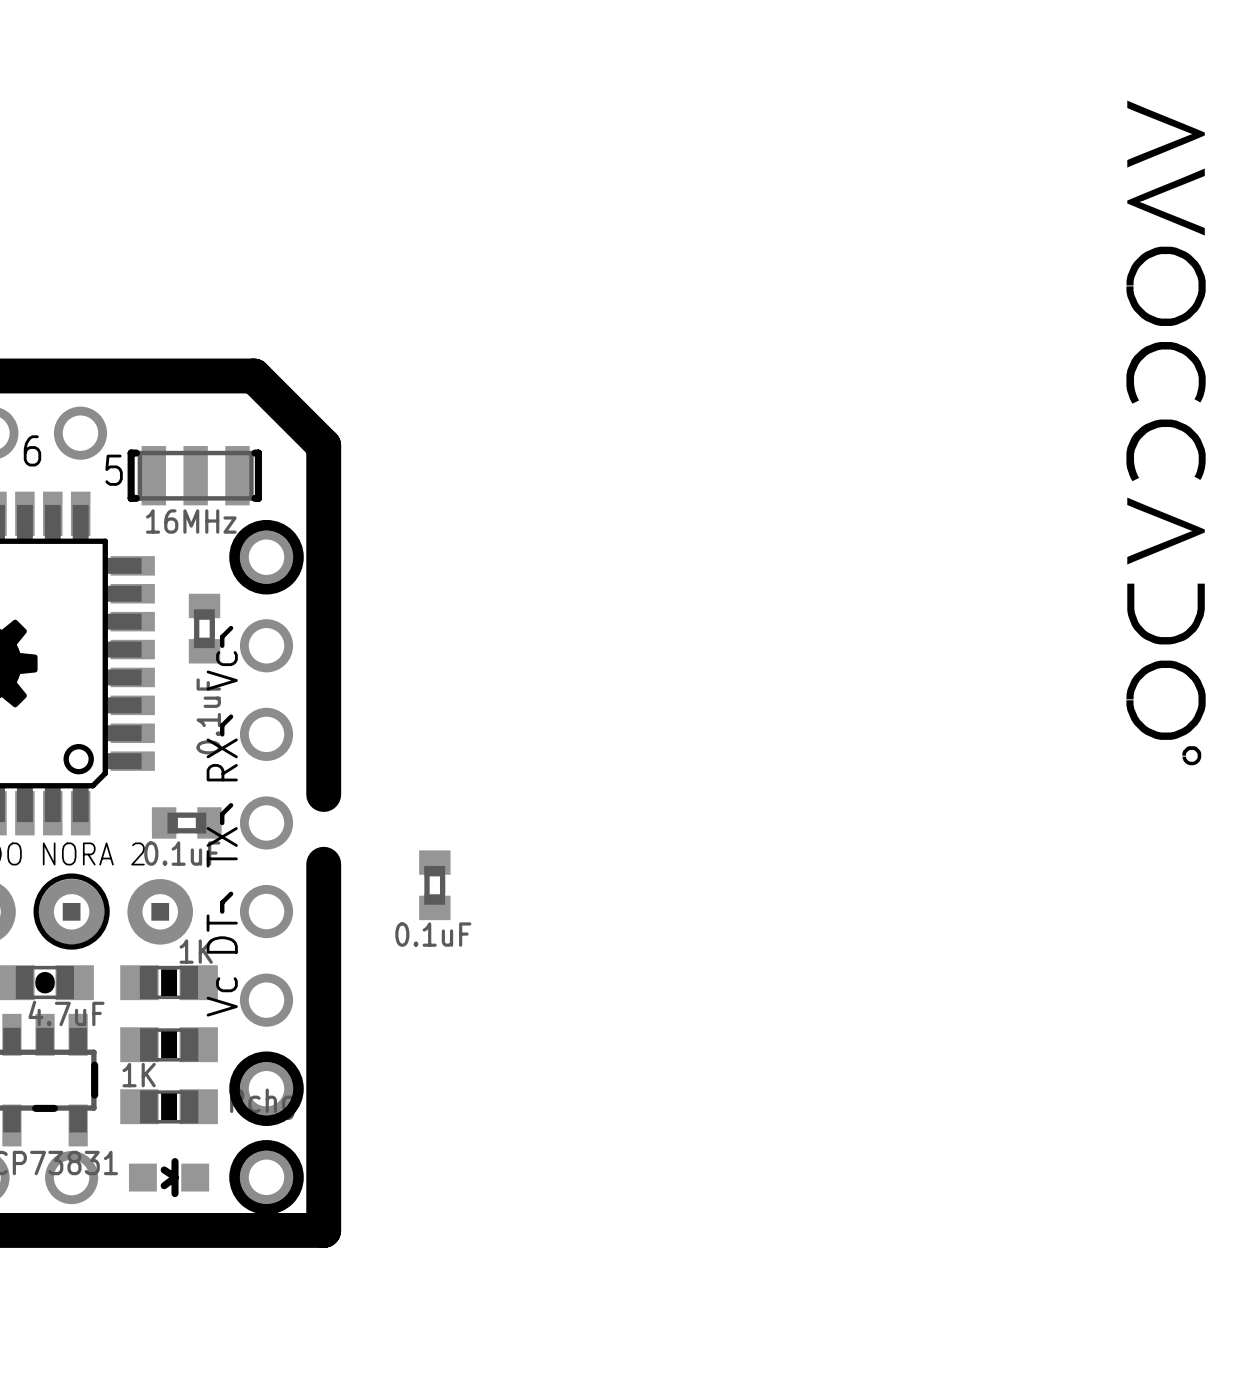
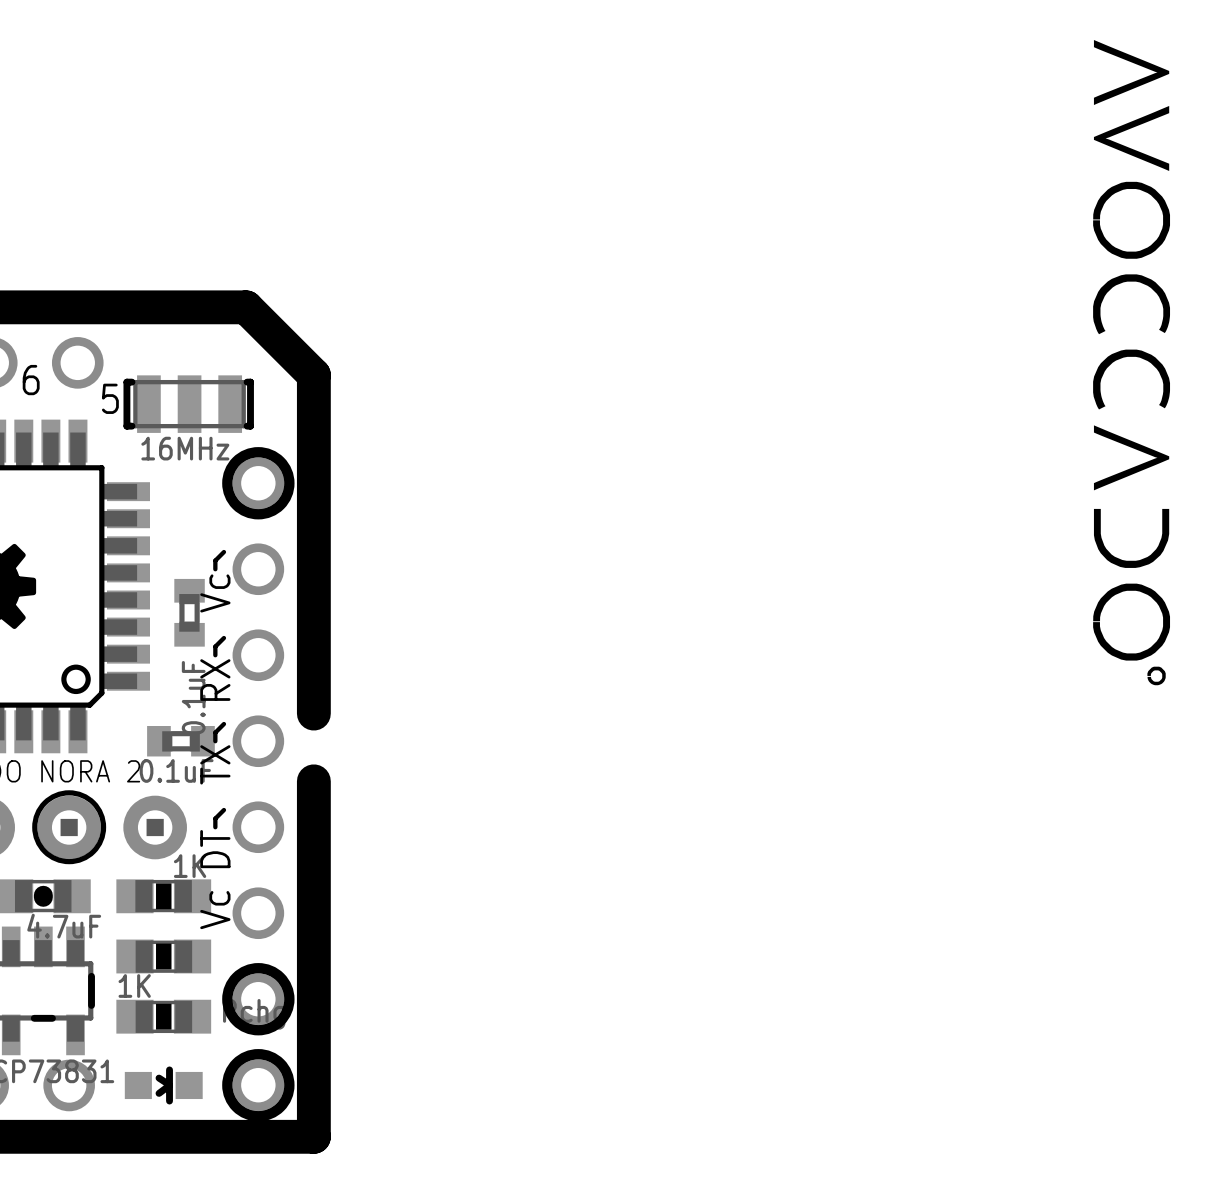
part position: (204, 628) -> (189, 612)
part: 0.1uF (434, 885) -> none

